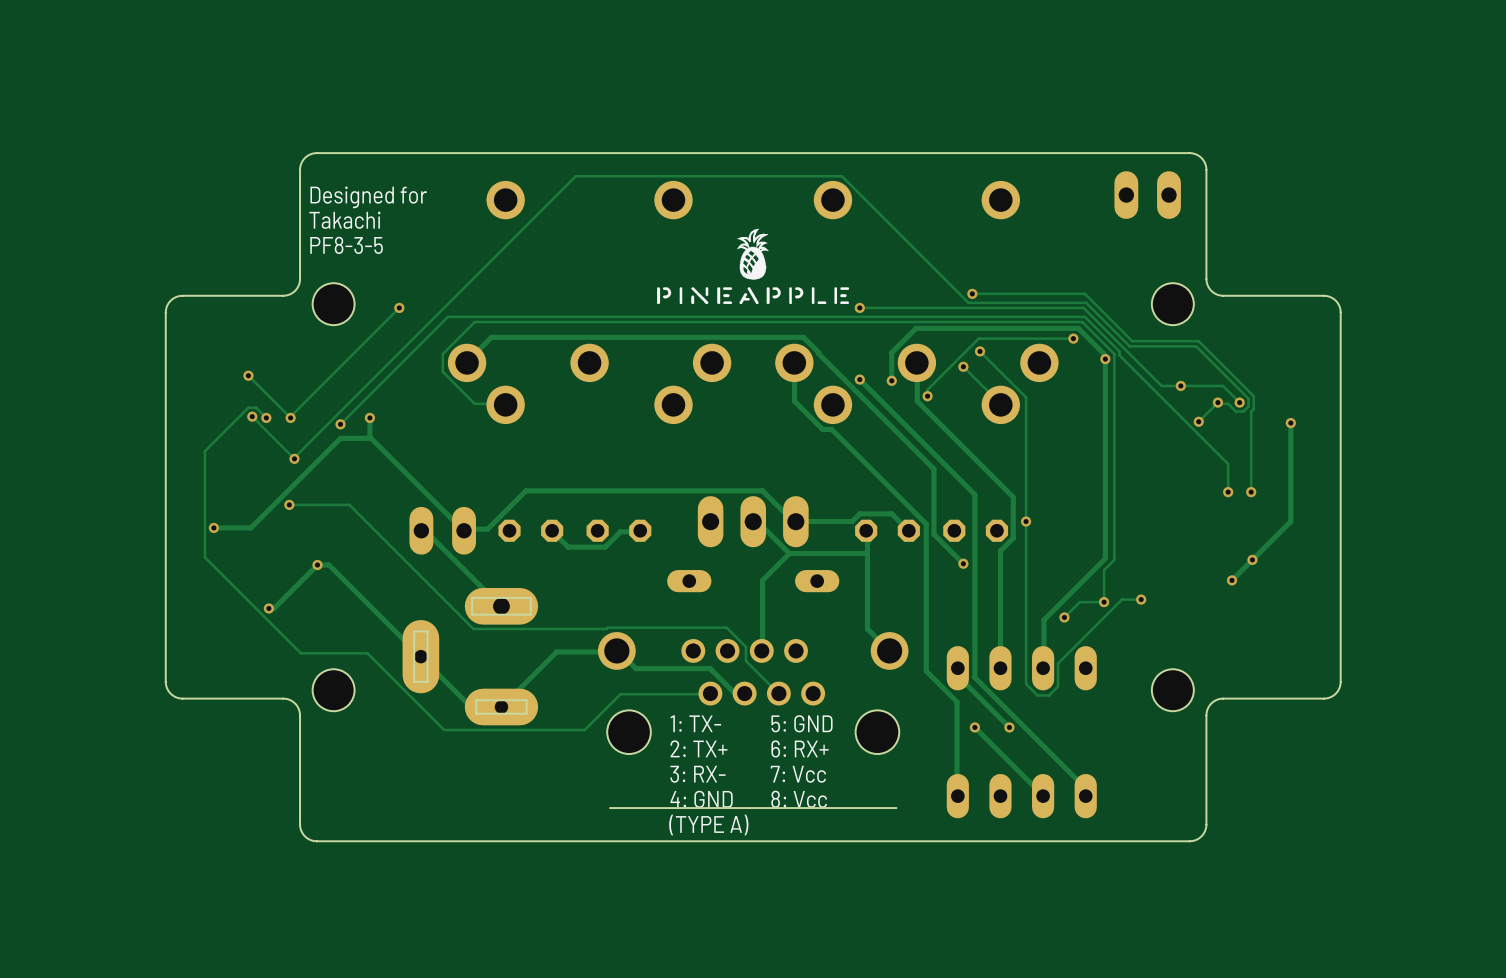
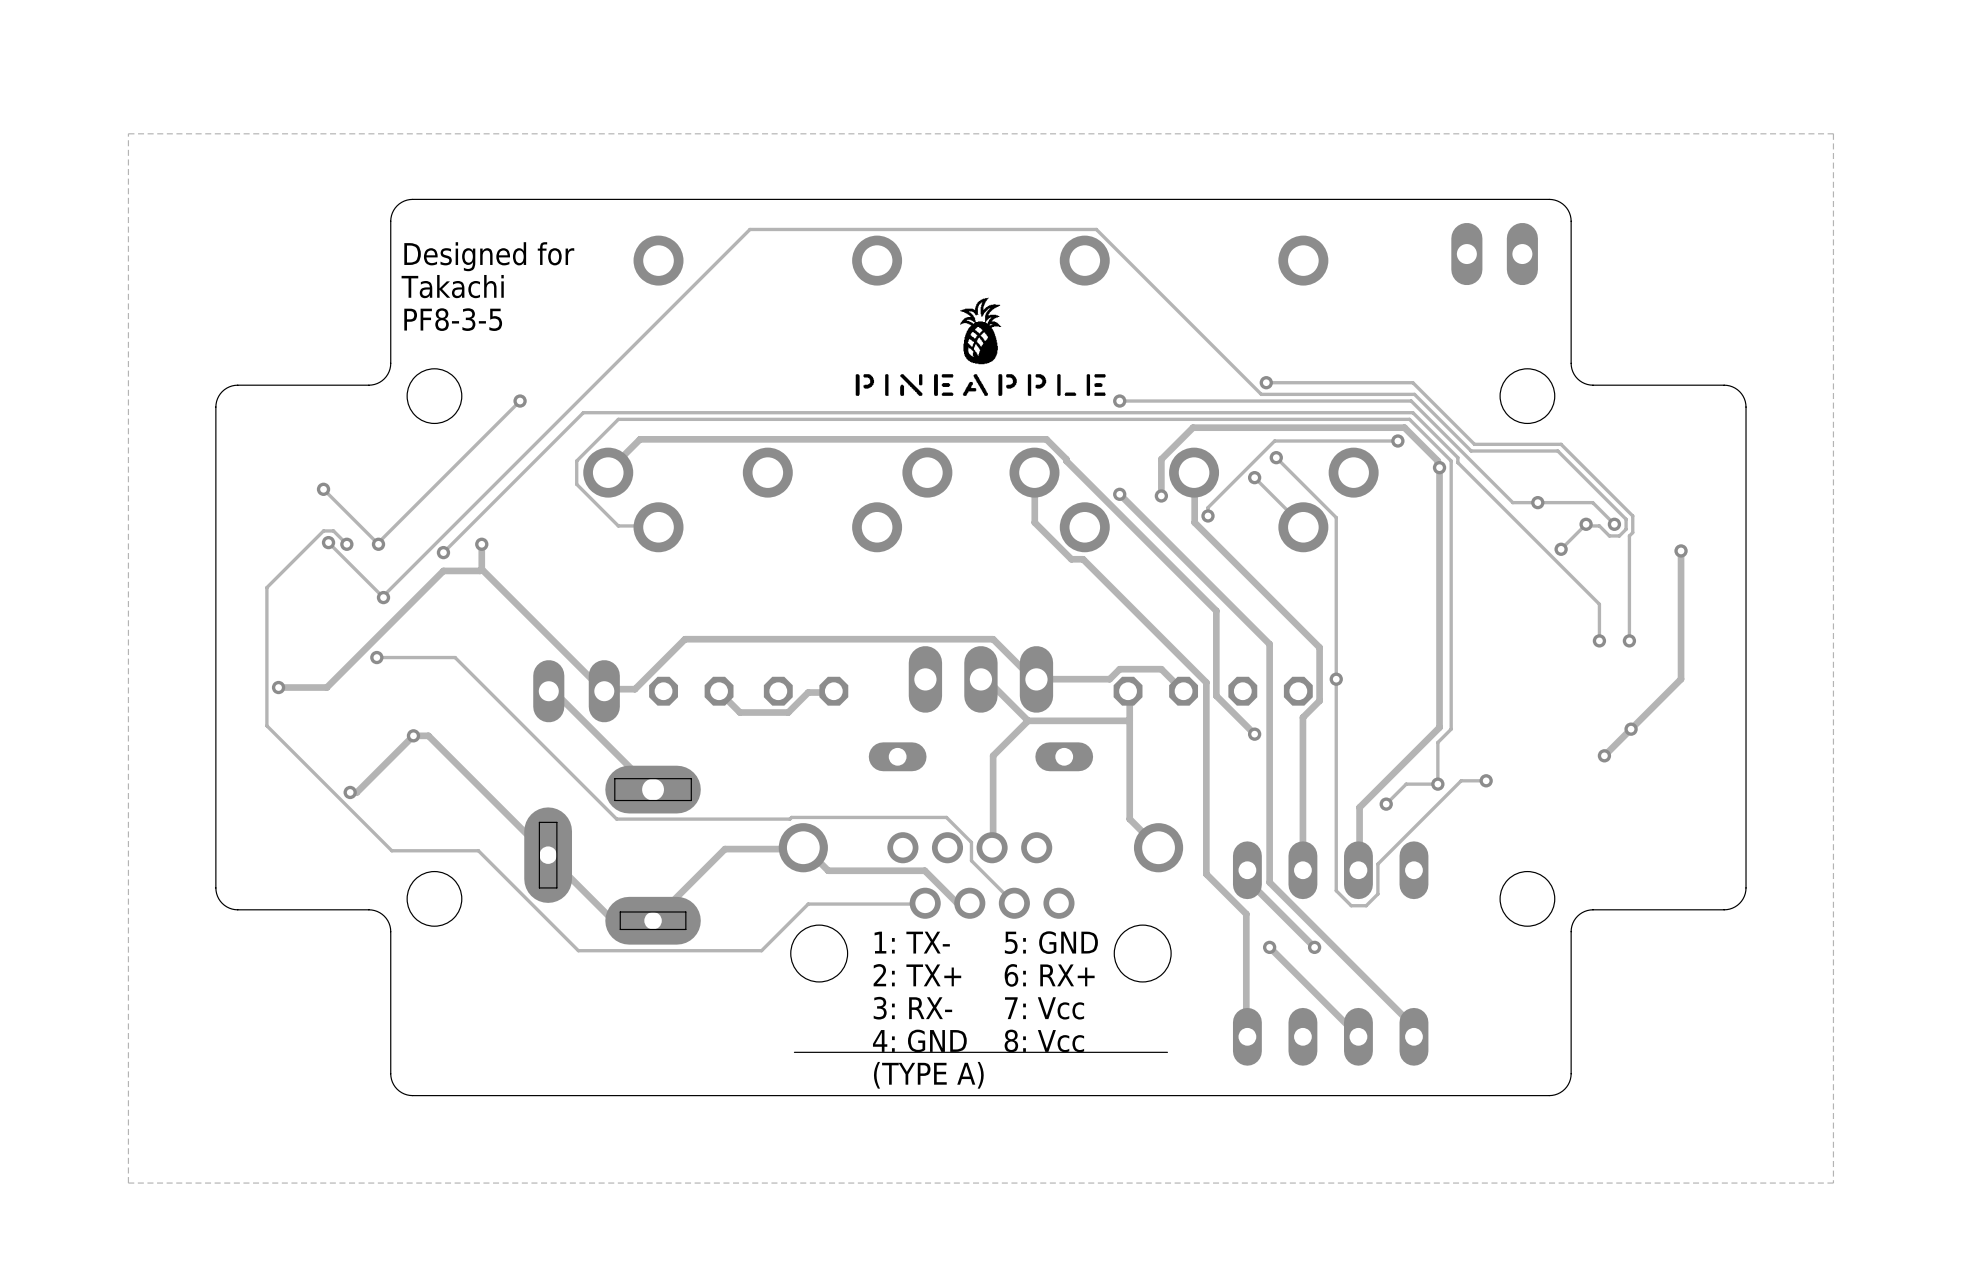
zone outline: none -> (1833, 133) (128, 133) (128, 1183) (1833, 1183) (1833, 133)

